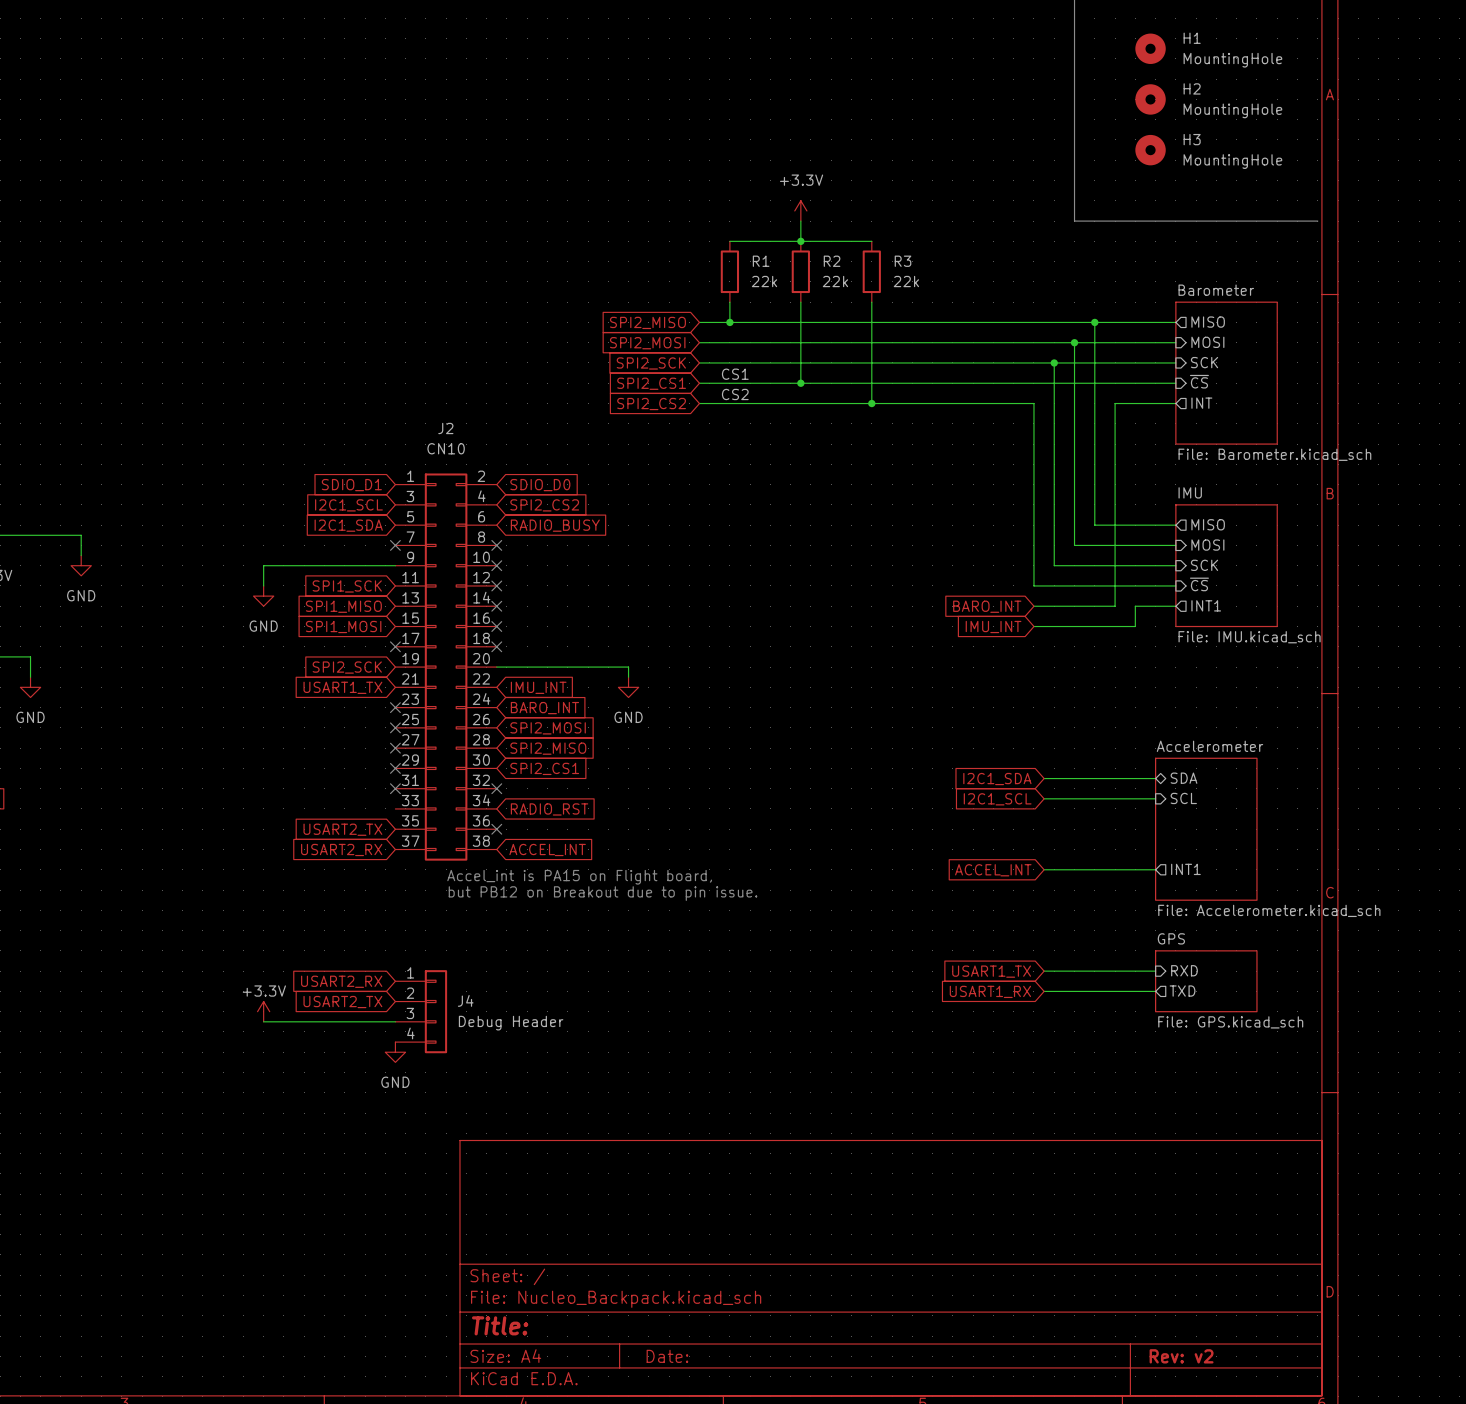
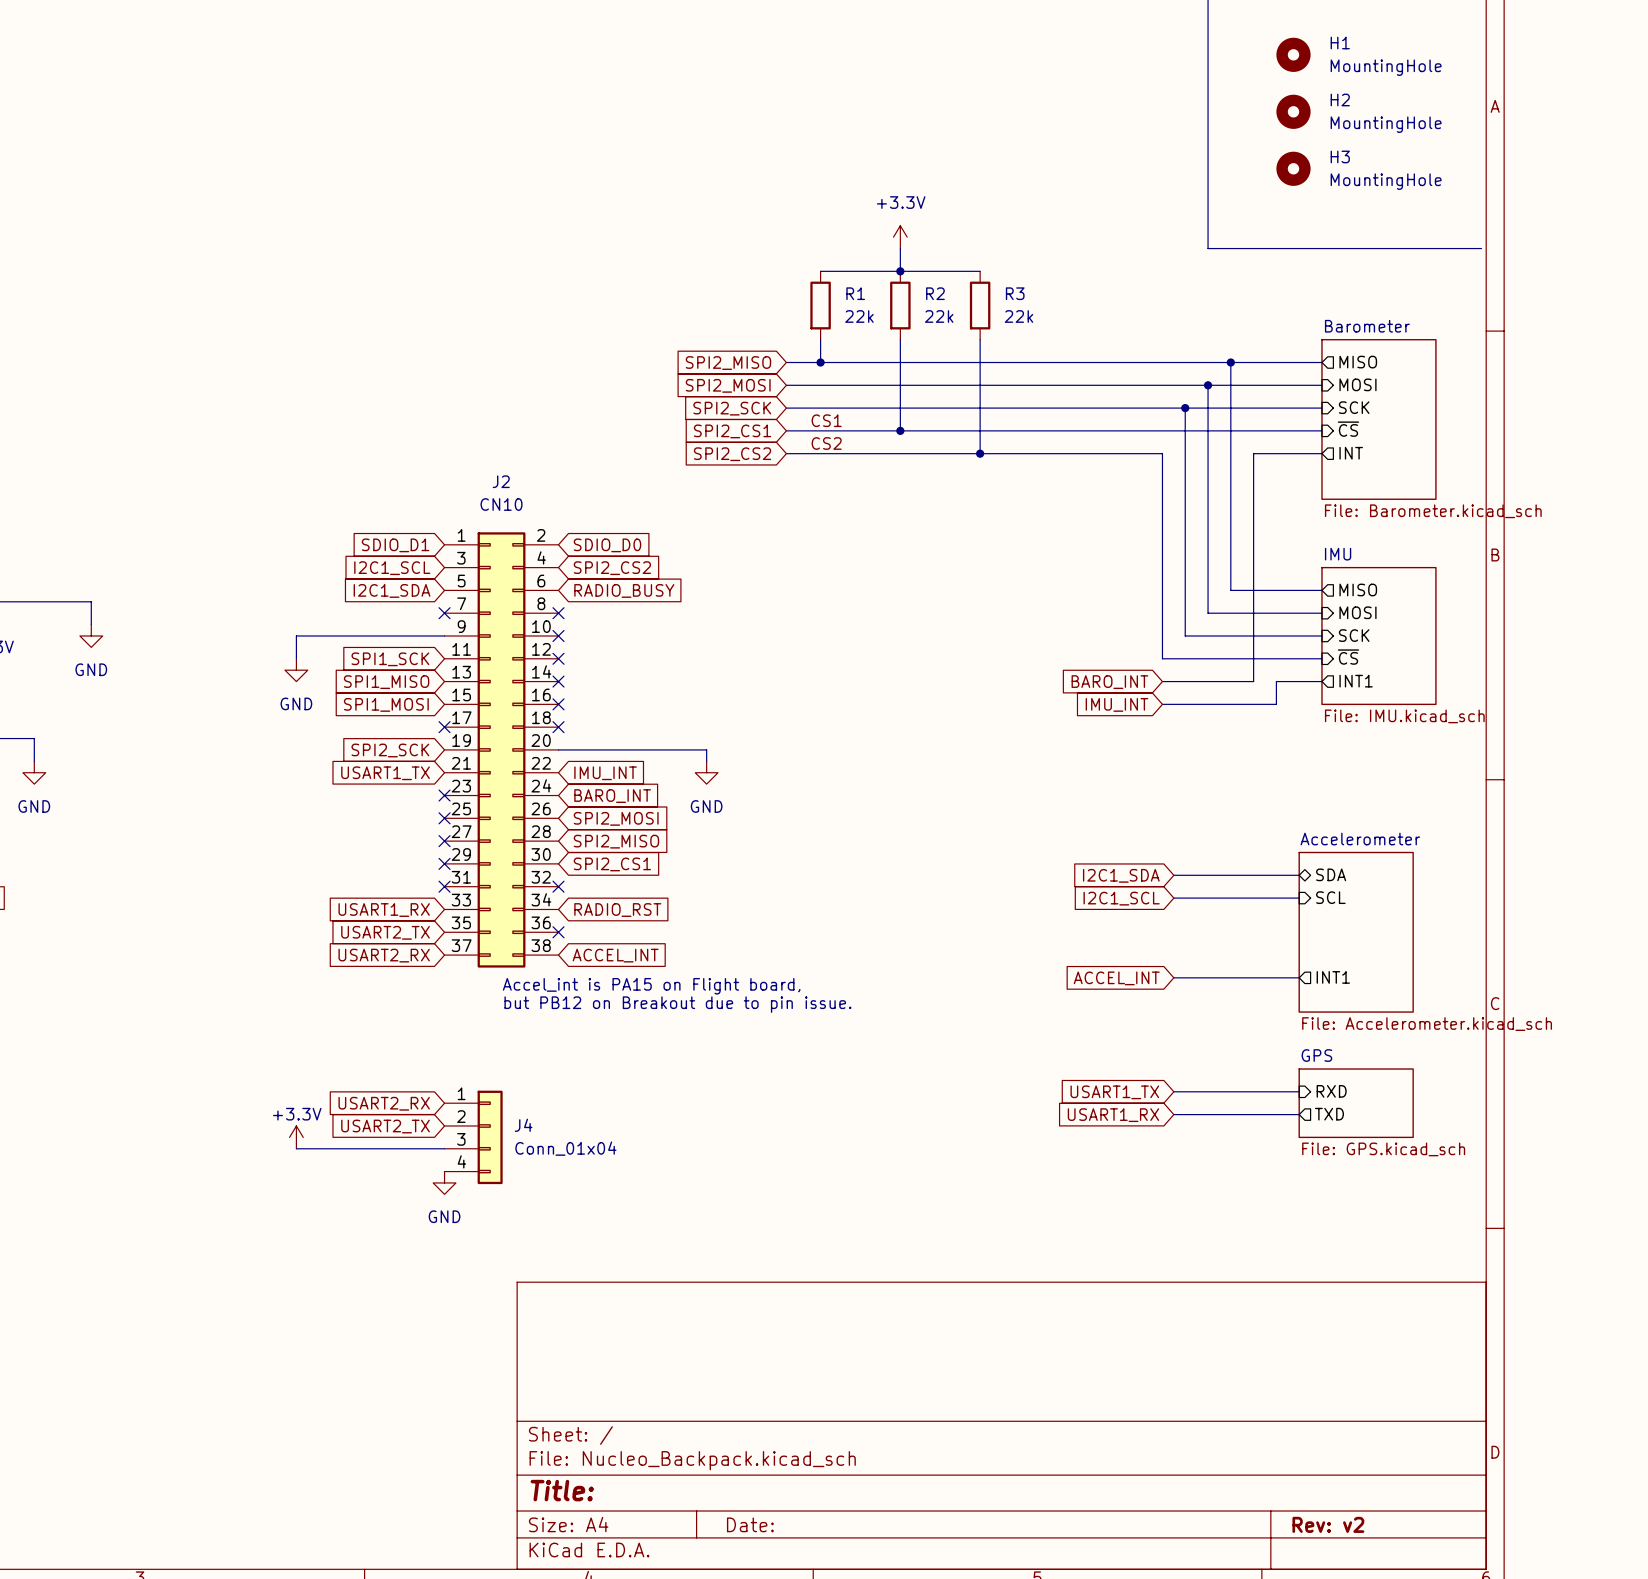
global label: none -> USART1_RX (384, 910)
J4 value: Debug Header (511, 1023) -> Conn_01x04 (565, 1148)

